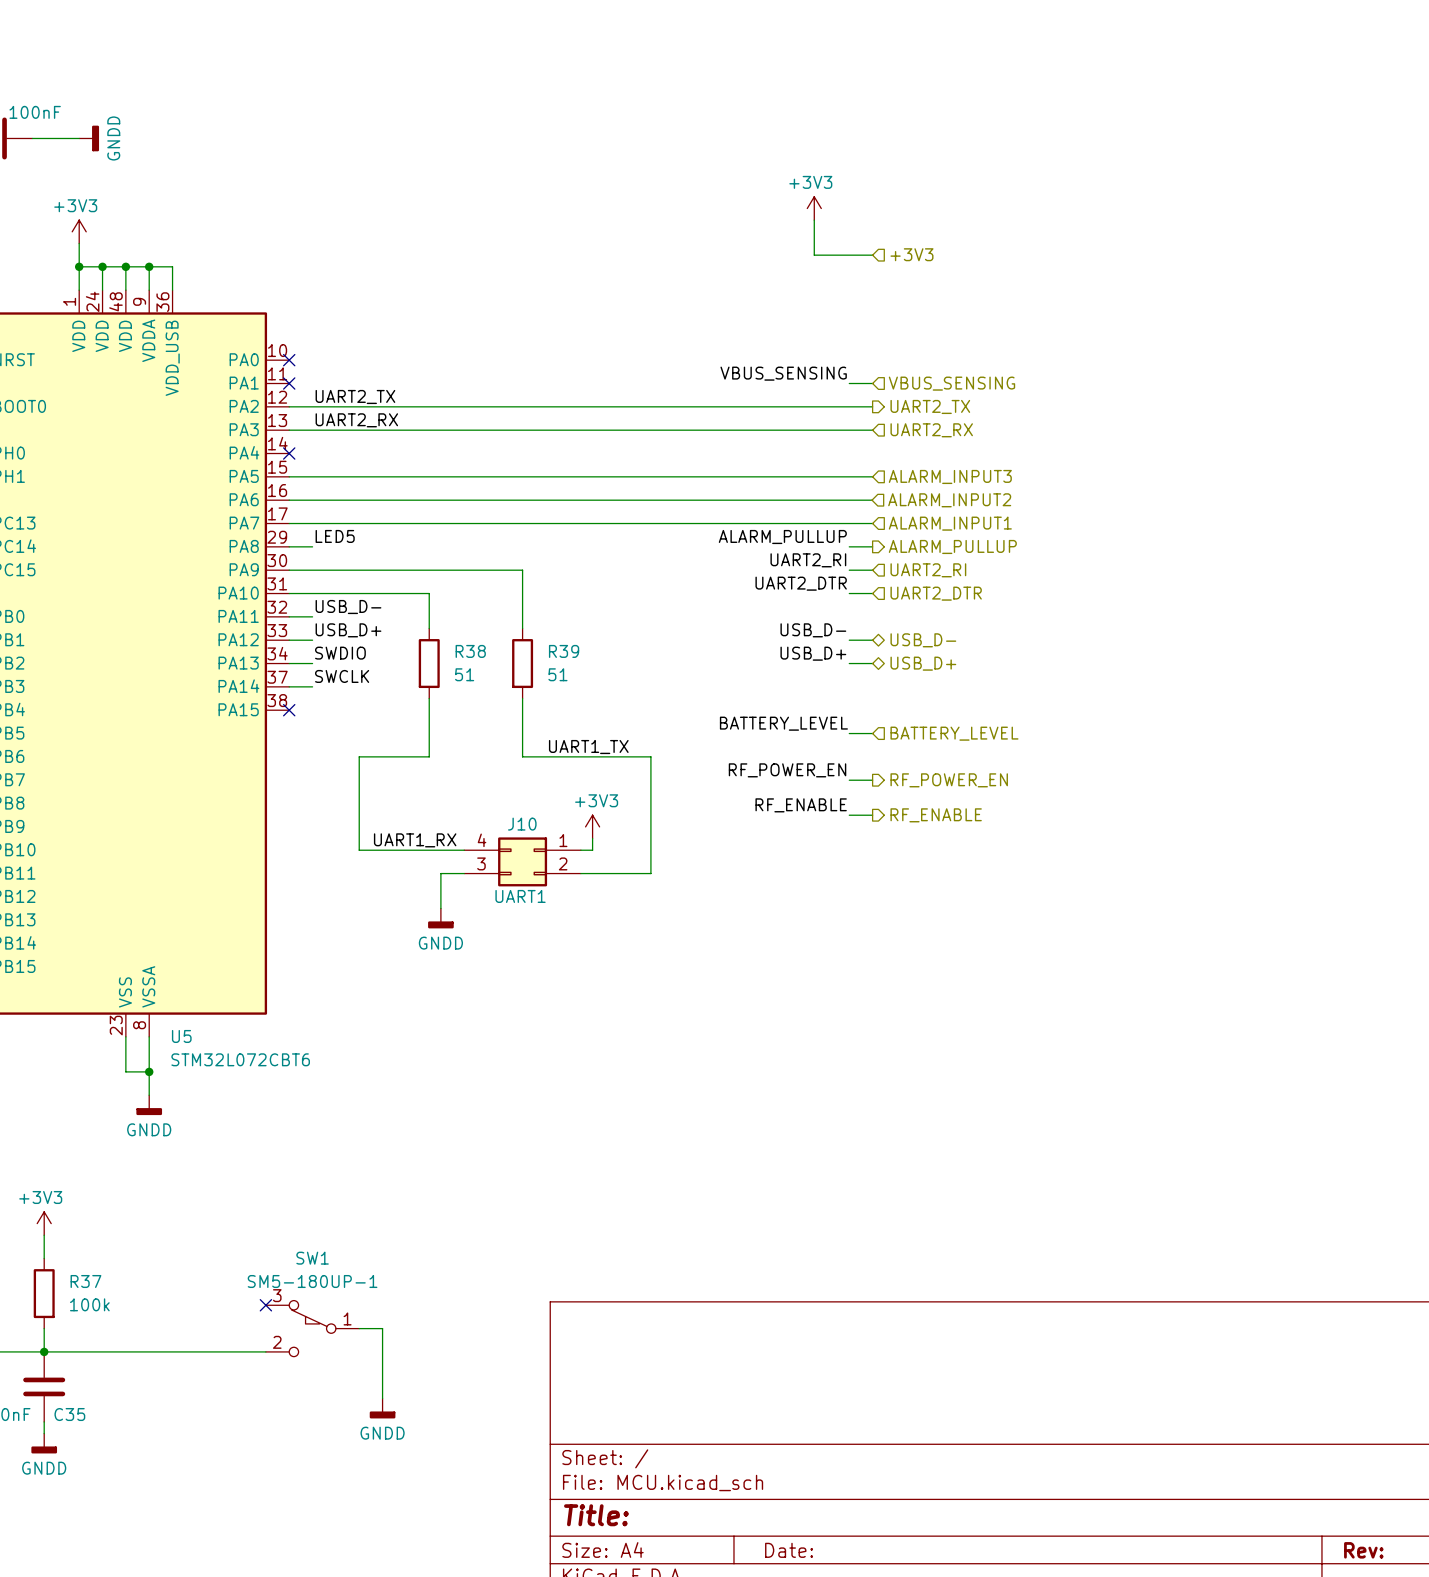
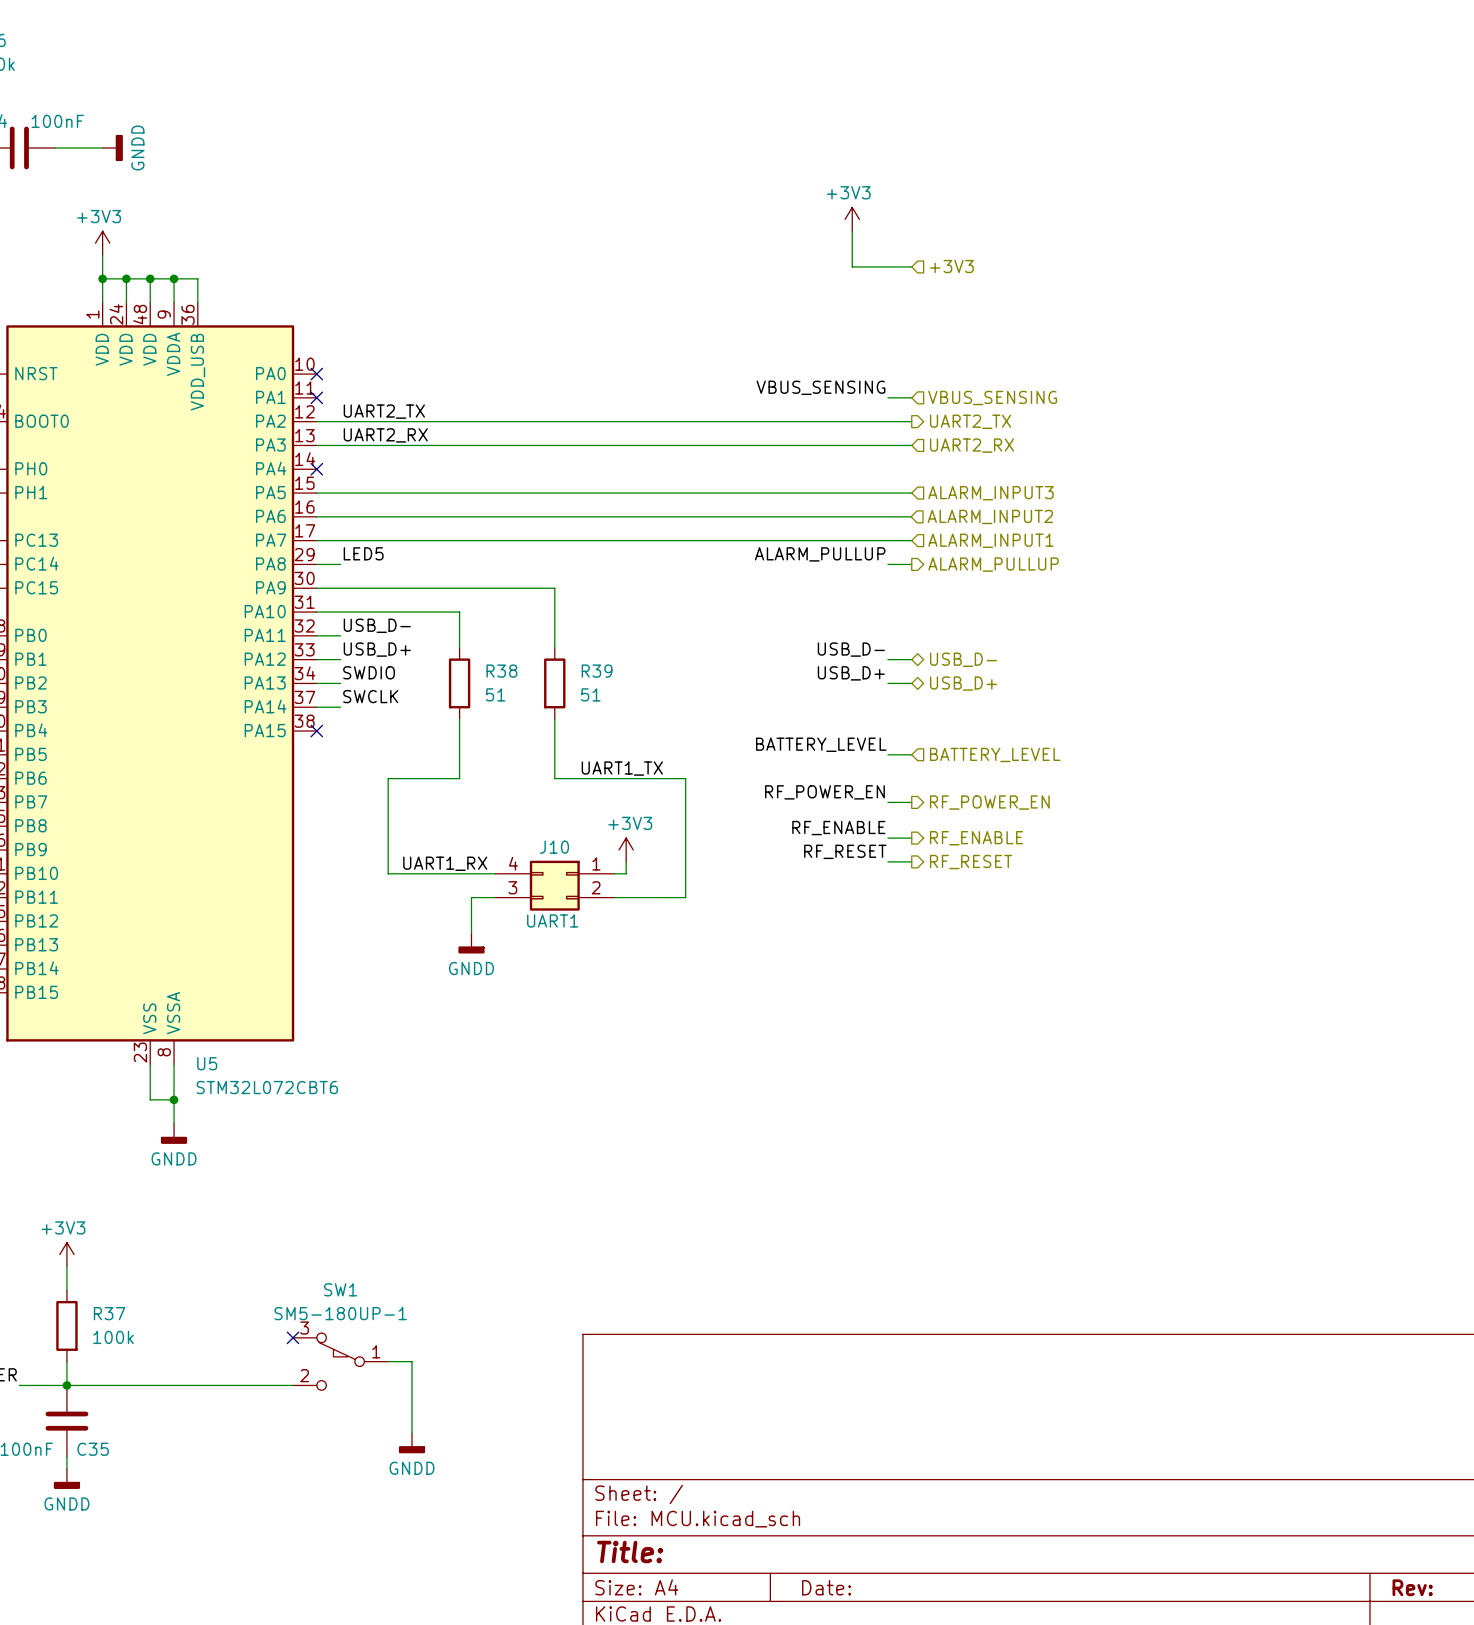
label: UART2_RI (808, 560) -> none
wire: (849, 570) (872, 570) -> none
hierarchical label: UART2_RI (928, 570) -> none
label: UART2_DTR (801, 583) -> none
wire: (849, 593) (872, 593) -> none
hierarchical label: UART2_DTR (936, 593) -> none
label: none -> RF_RESET (845, 851)
wire: none -> (887, 861) (911, 861)
hierarchical label: none -> RF_RESET (971, 862)

